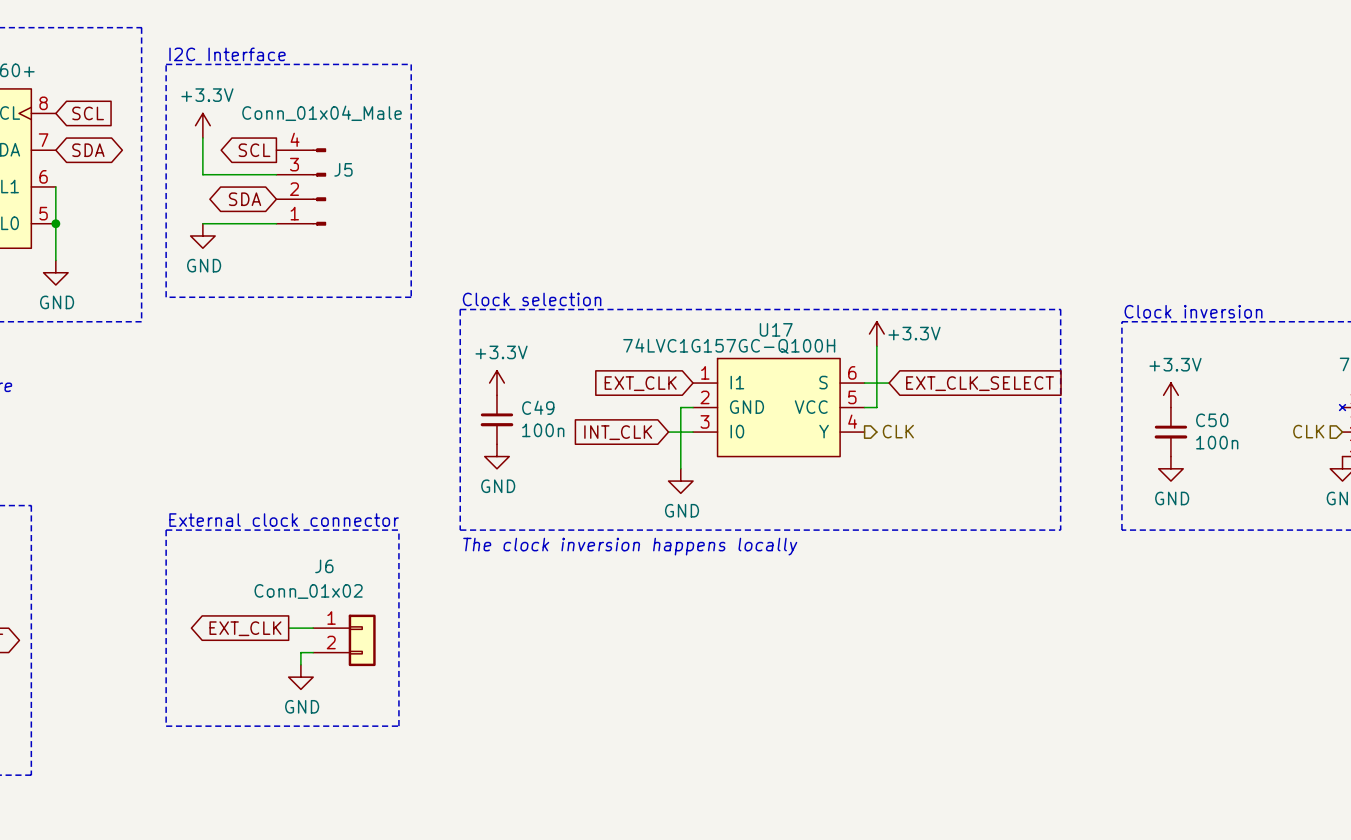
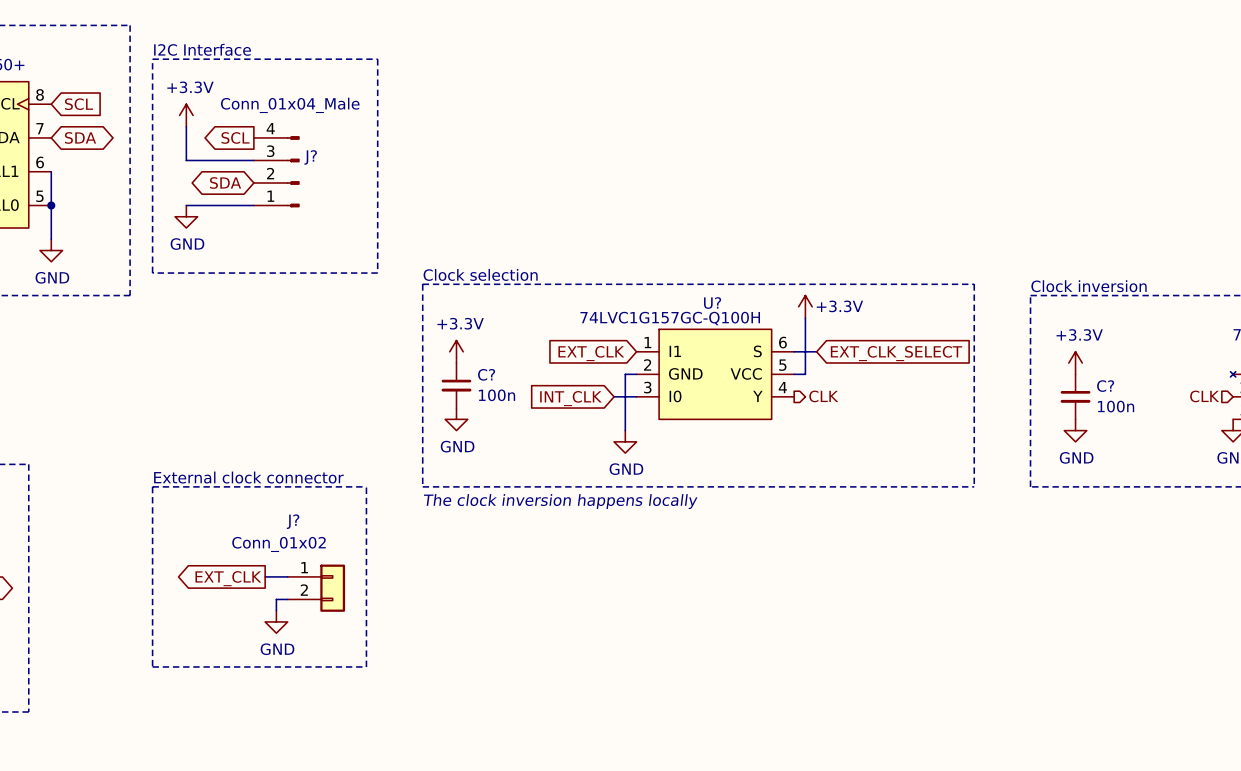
J5 name: J5 (343, 169) -> J? (310, 157)
U17 name: U17 (776, 329) -> U? (712, 303)
C49 name: C49 (538, 407) -> C? (486, 374)
C50 name: C50 (1212, 420) -> C? (1105, 386)
J6 name: J6 (324, 566) -> J? (293, 521)

